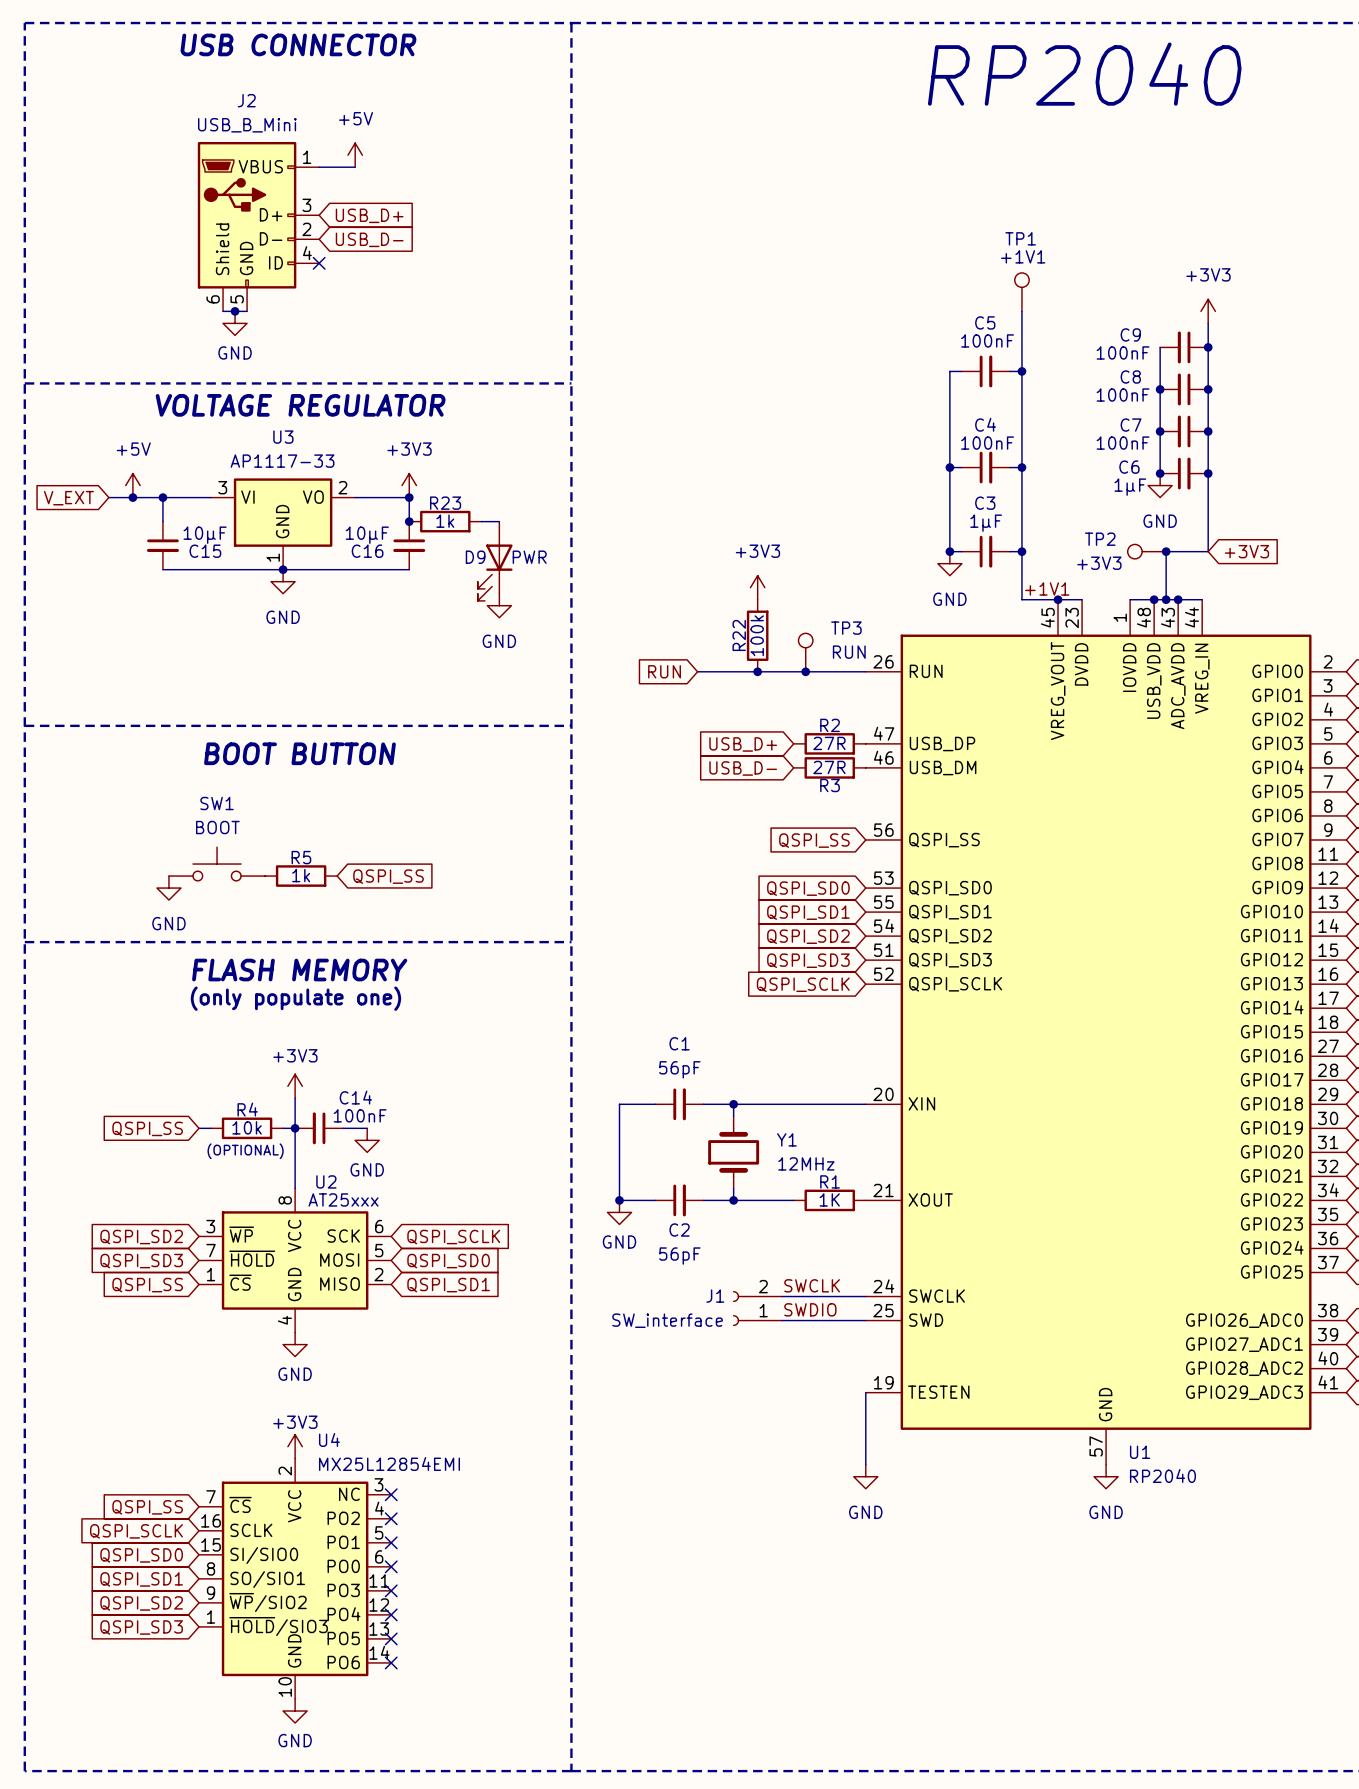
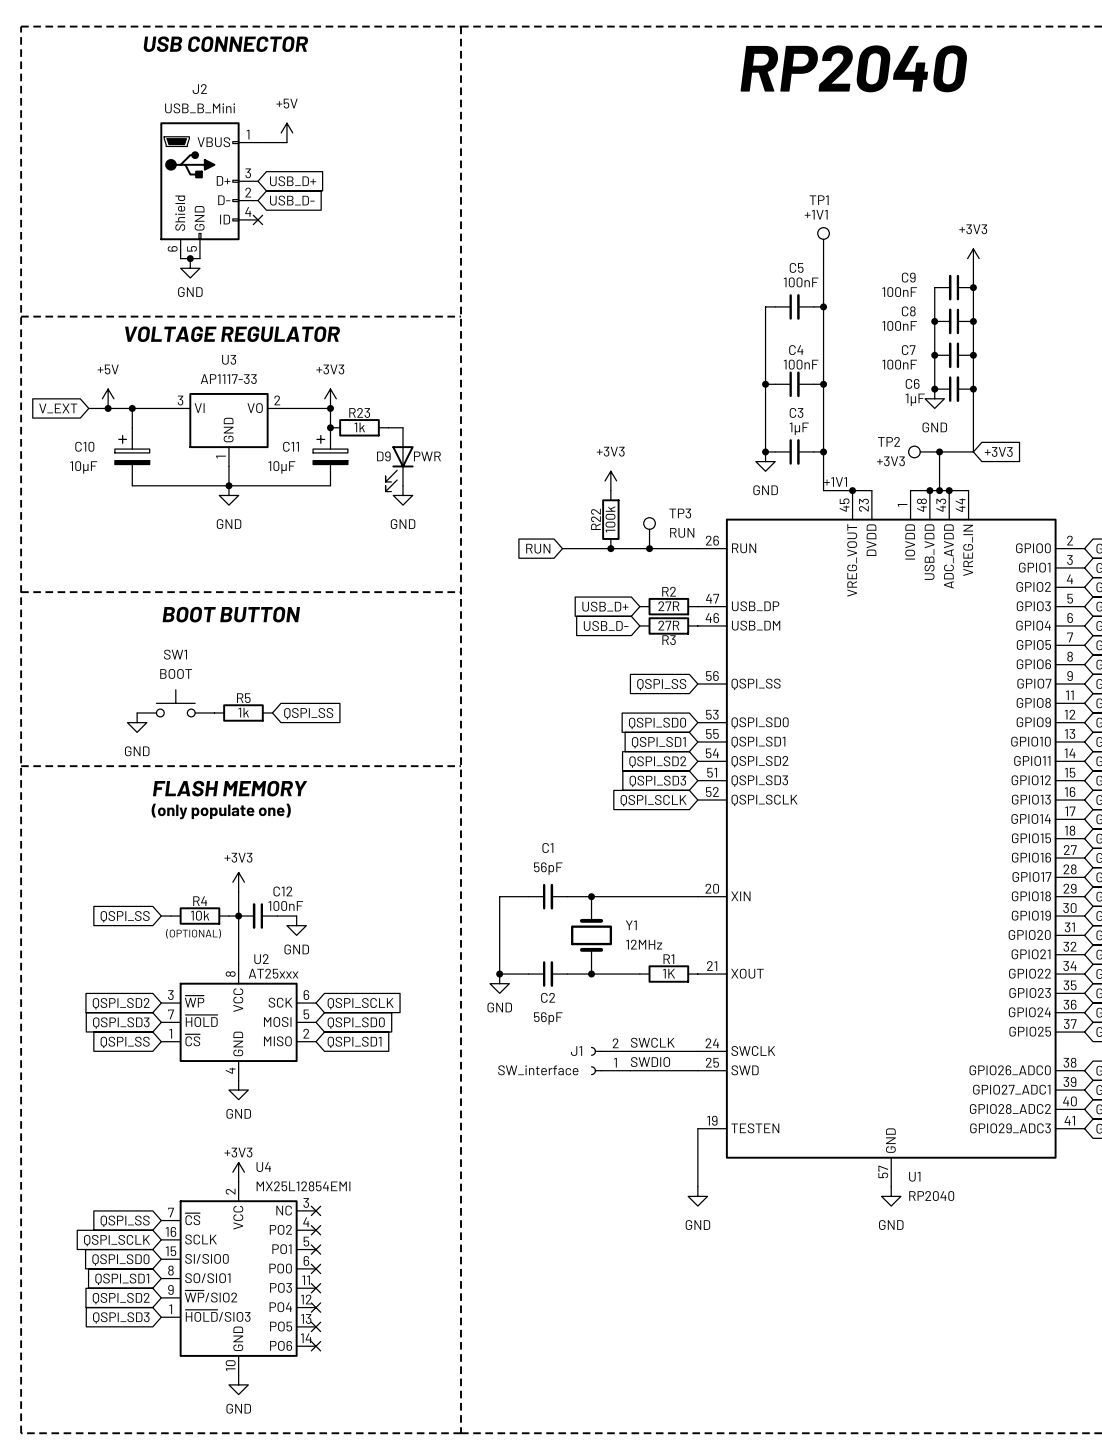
C15: 10µF (162, 545) -> none
C16: 10µF (409, 545) -> none
C10: none -> 10µF (132, 456)
C11: none -> 10µF (330, 456)
wire: (162, 569) (409, 569) -> (132, 485) (330, 485)
junction position: (283, 569) -> (228, 485)
power symbol position: GND (283, 581) -> GND (228, 495)
C14 name: C14 (355, 1097) -> C12 (282, 891)

